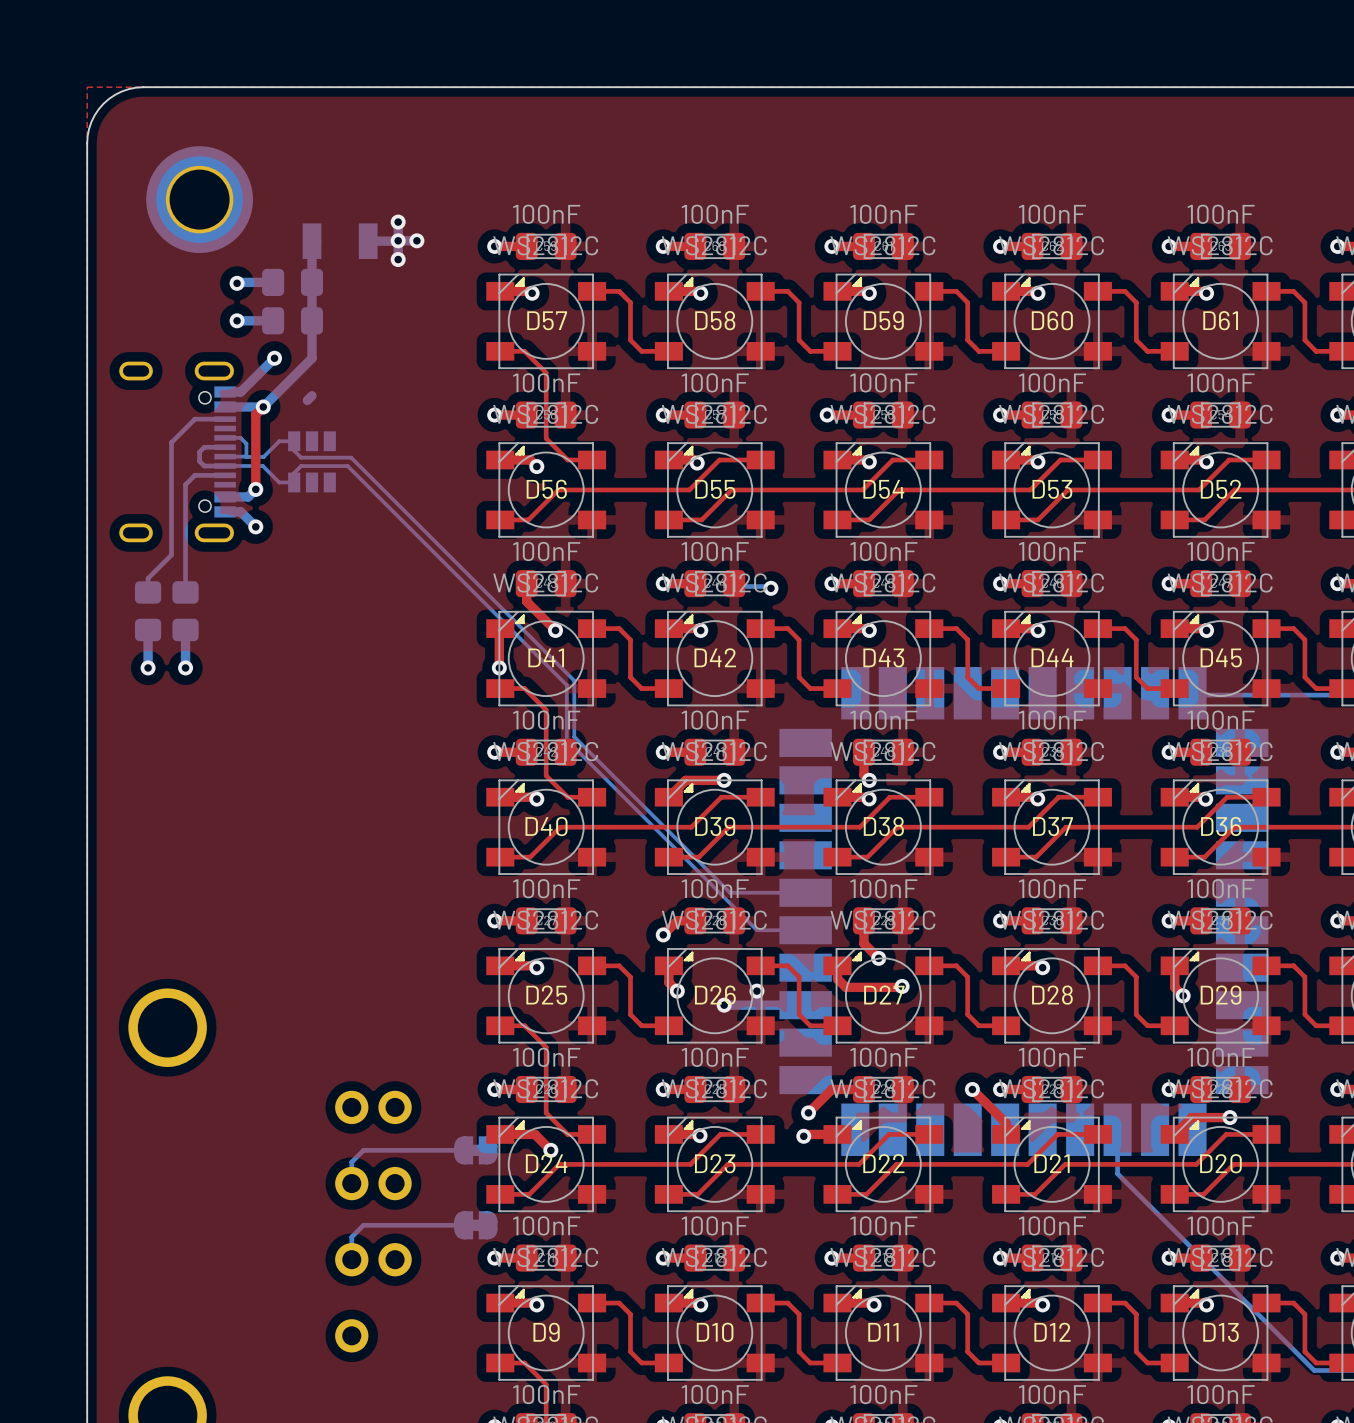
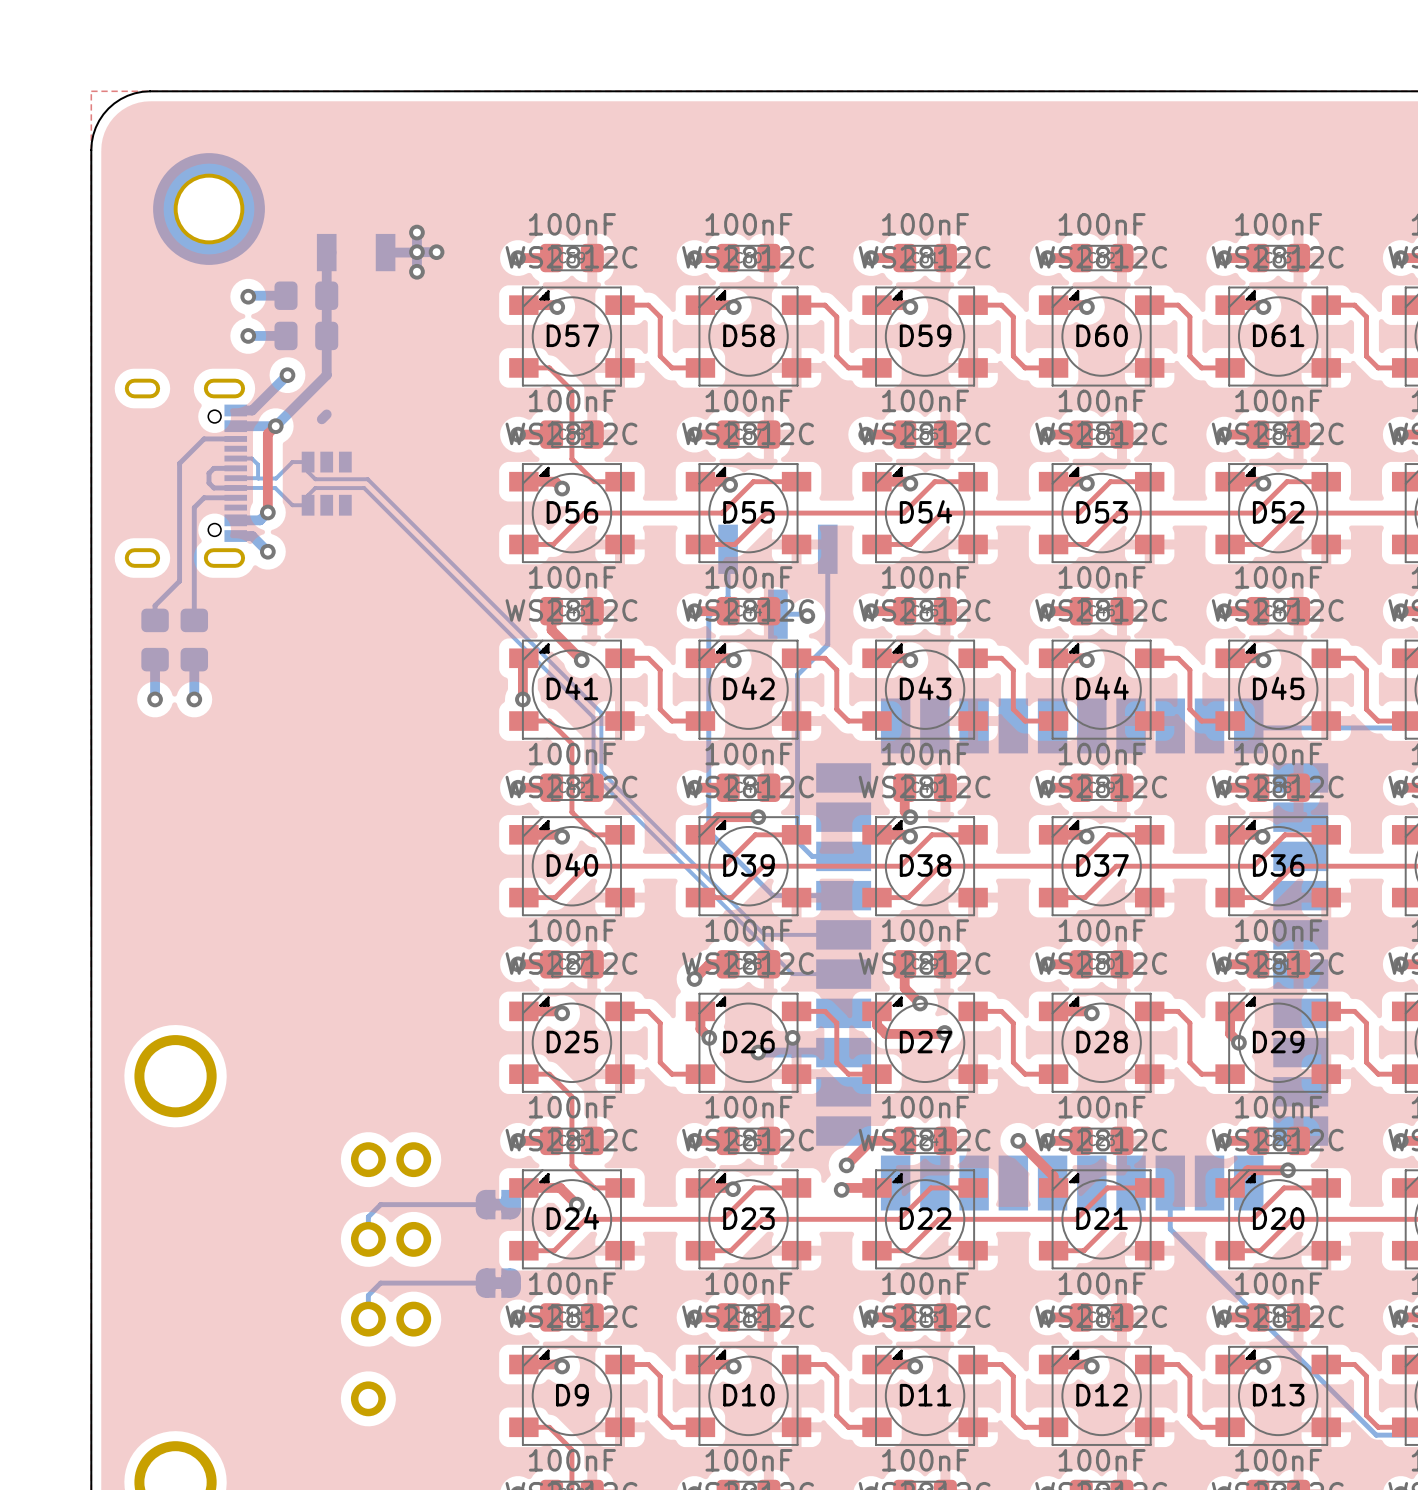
bottom track: none -> (728, 549) (728, 597) (708, 616) (708, 831) (773, 895) (843, 895)
bottom track: none -> (827, 549) (827, 644) (797, 674) (797, 841) (812, 856) (843, 856)
part: none -> (777, 581)

